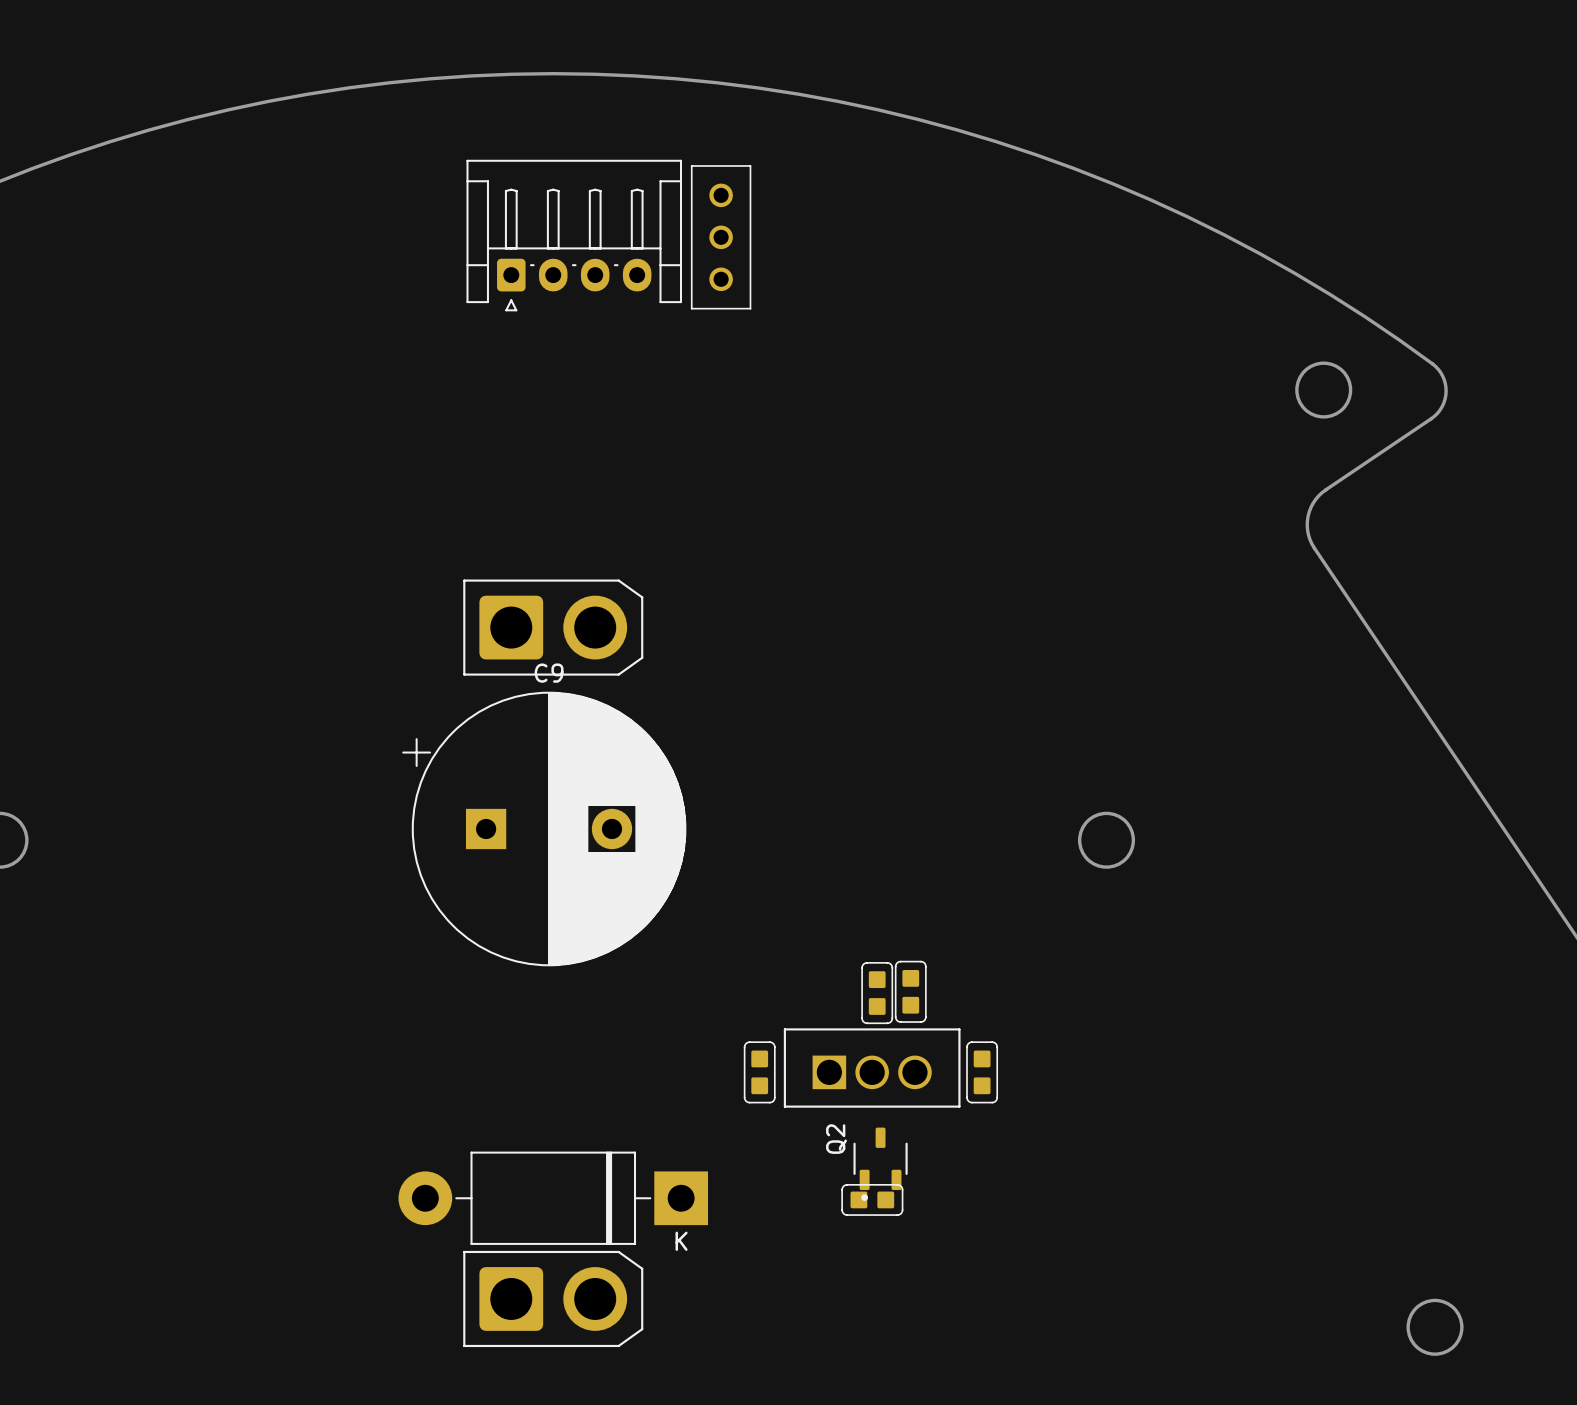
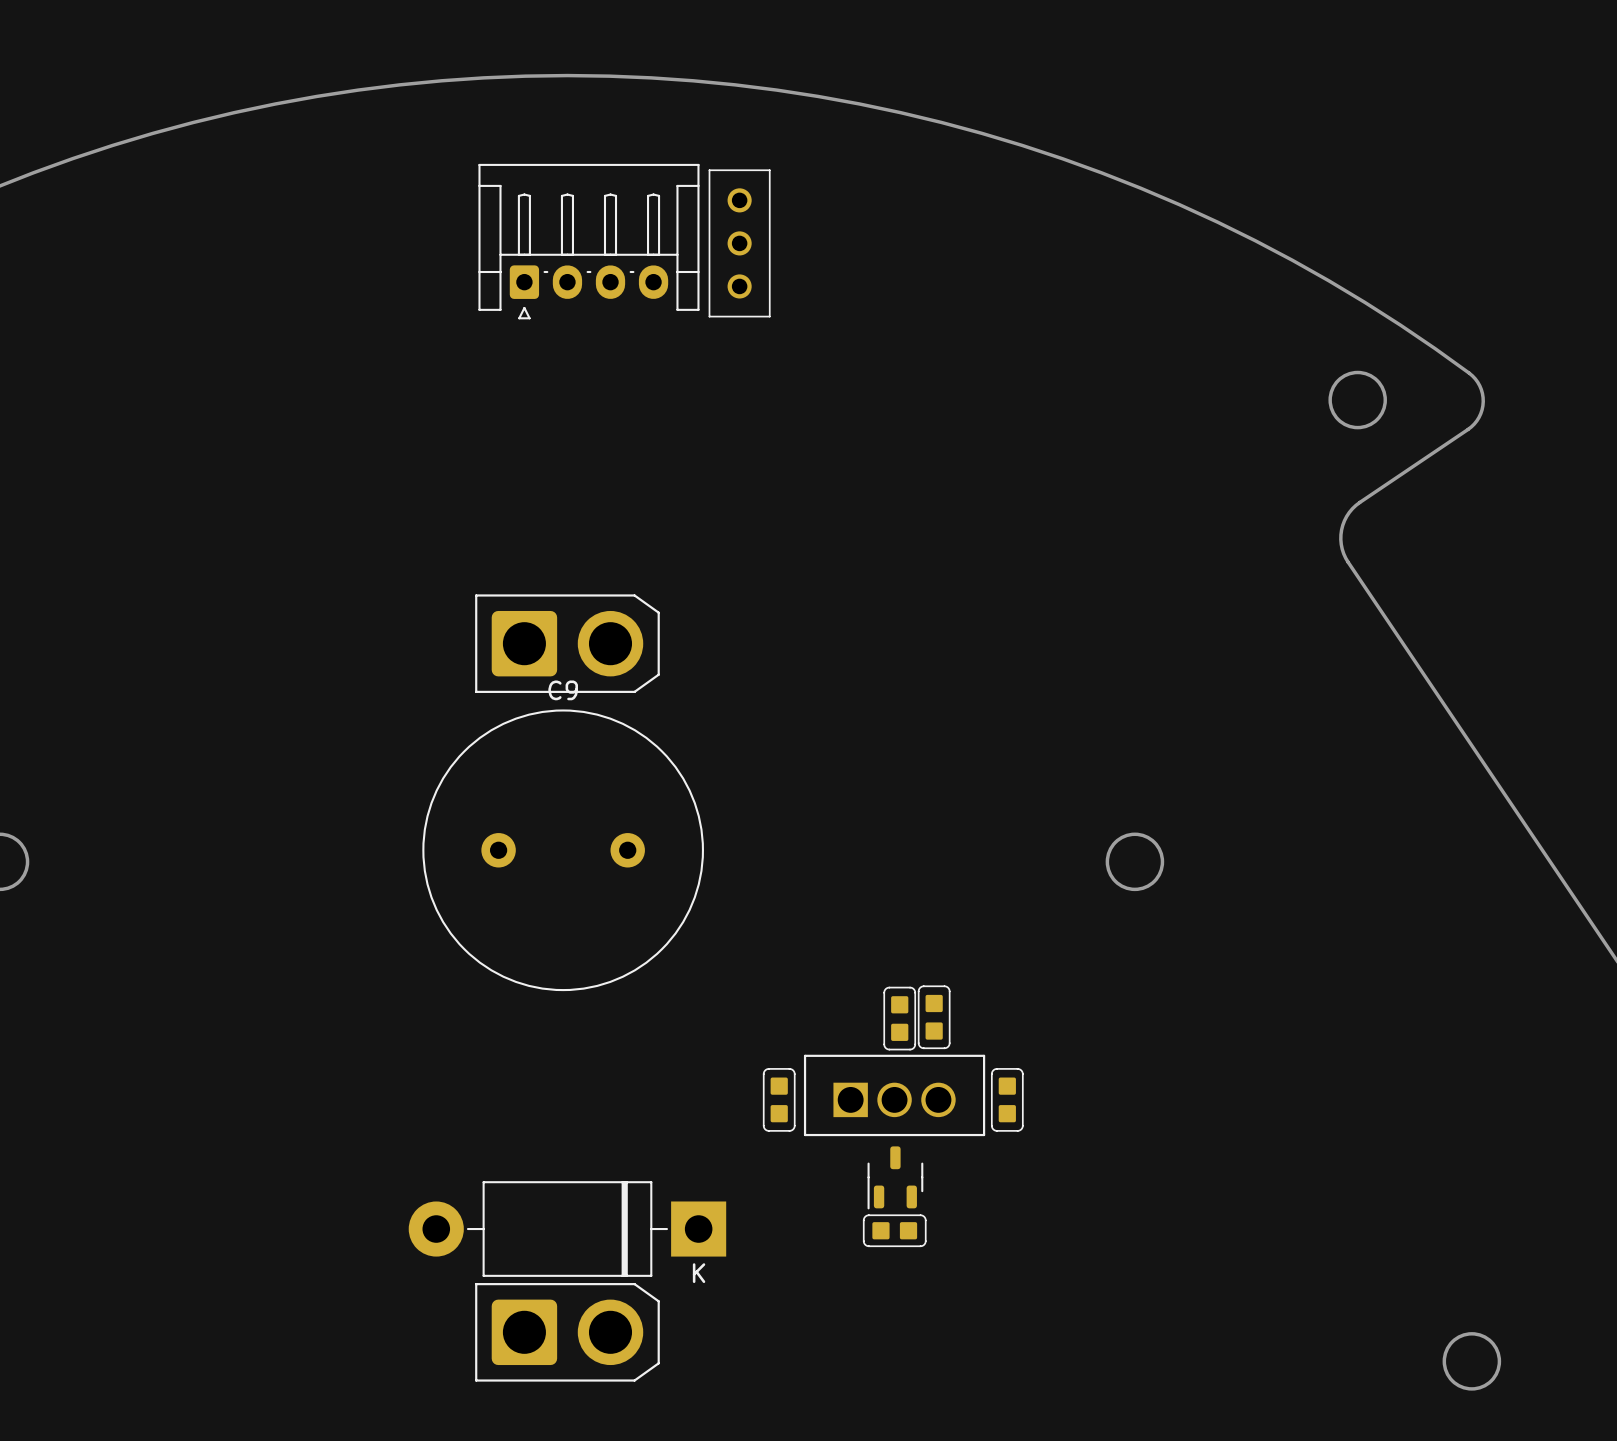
C9 footprint: [402, 691, 687, 967] -> [422, 709, 704, 992]
part: none -> (895, 1177)
Q2: (880, 1164) -> none

